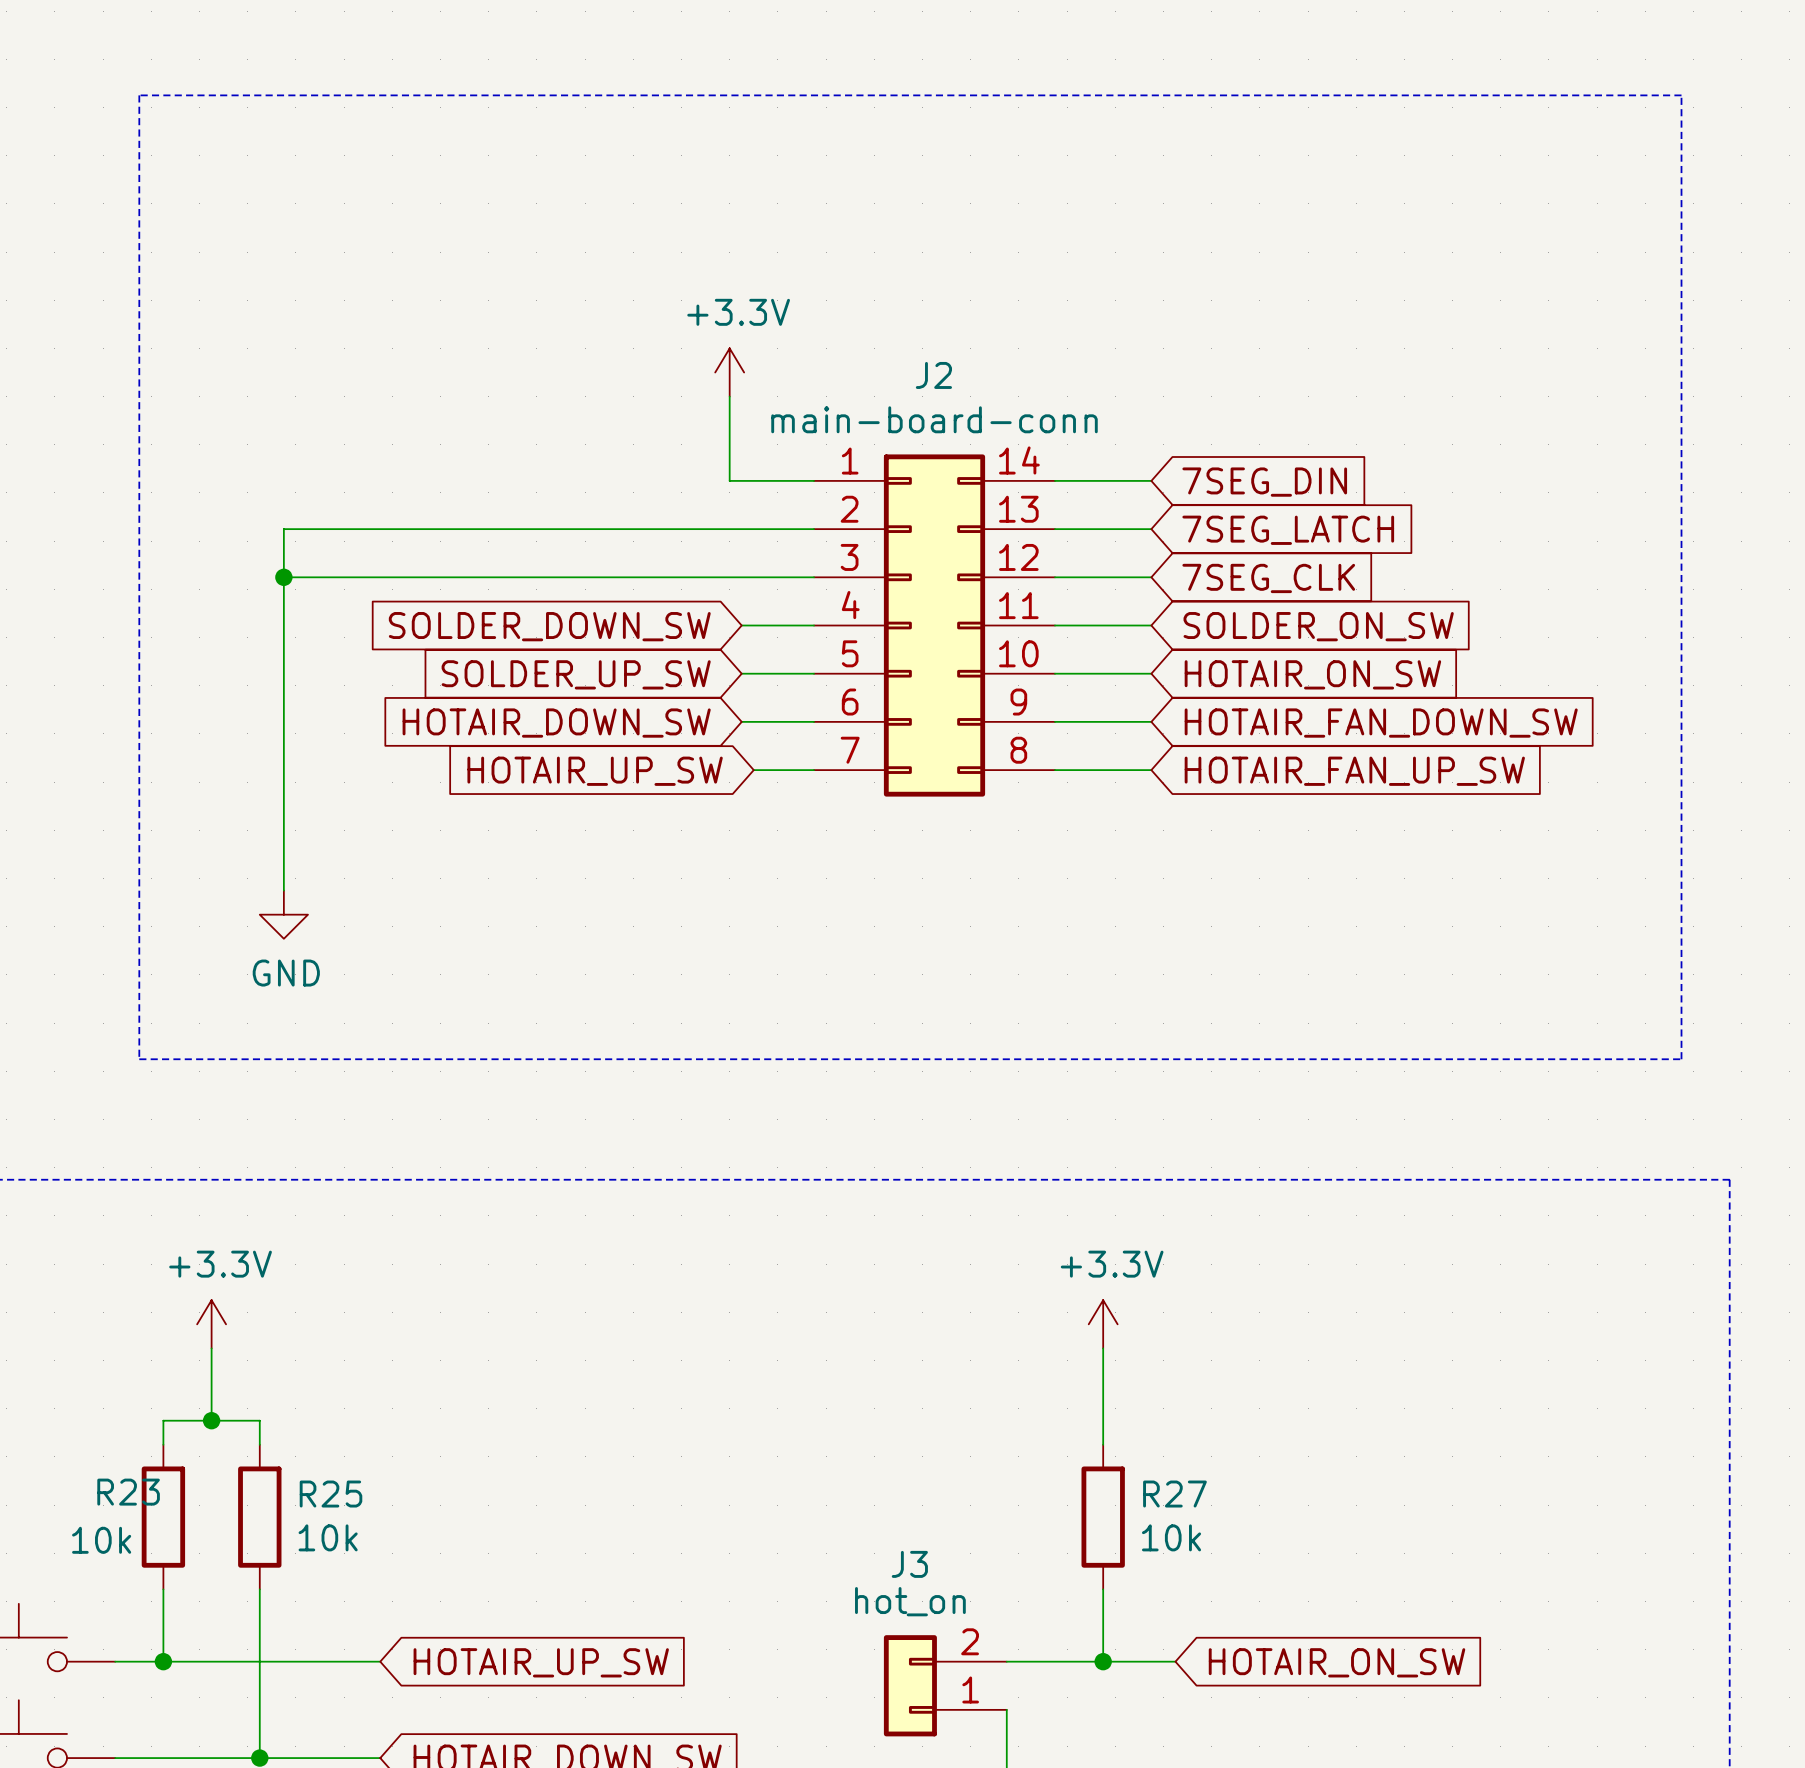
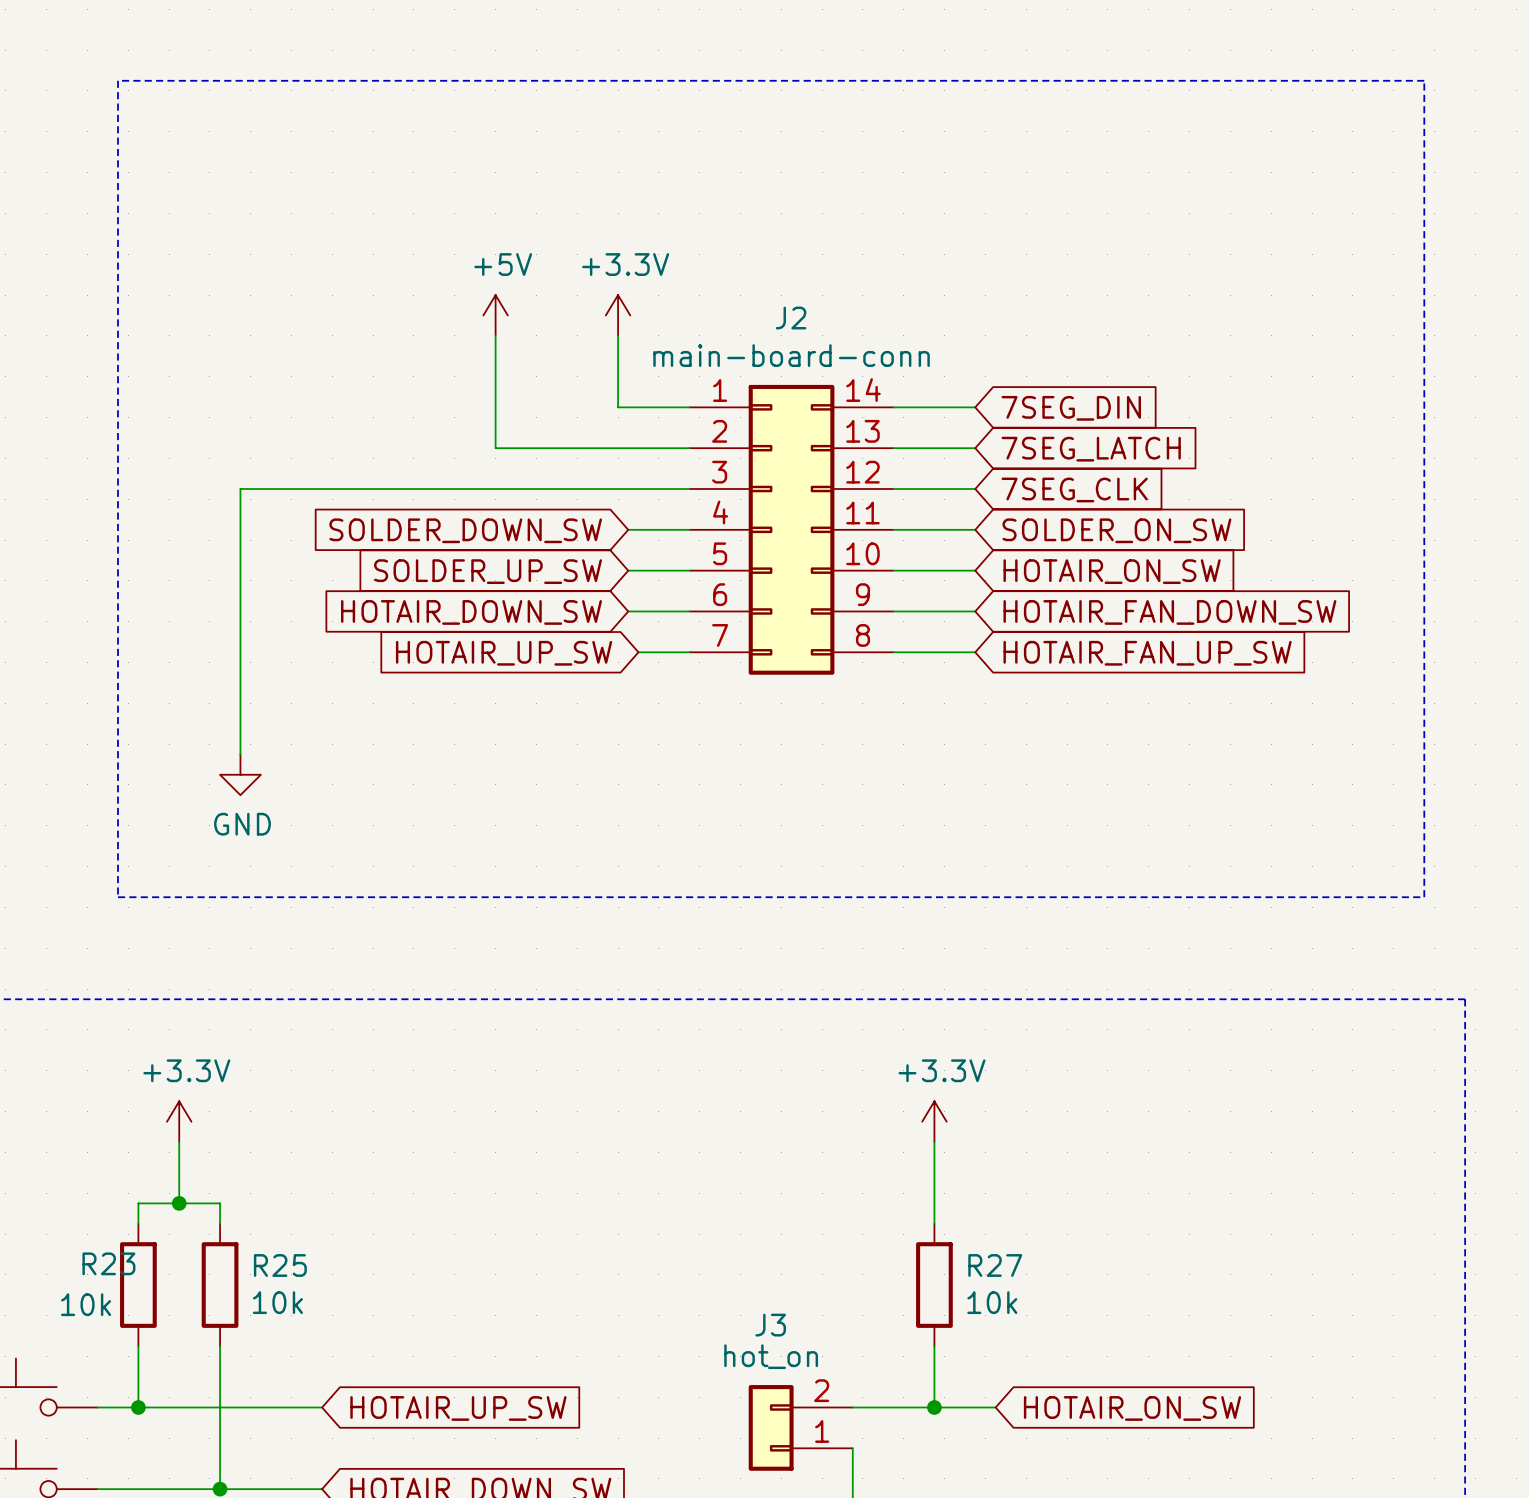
power symbol: none -> +5V (495, 315)
wire: (585, 529) (283, 529) (283, 577) -> (495, 448) (495, 335)
junction: (283, 577) -> none

